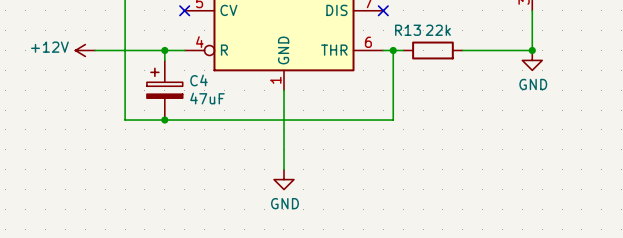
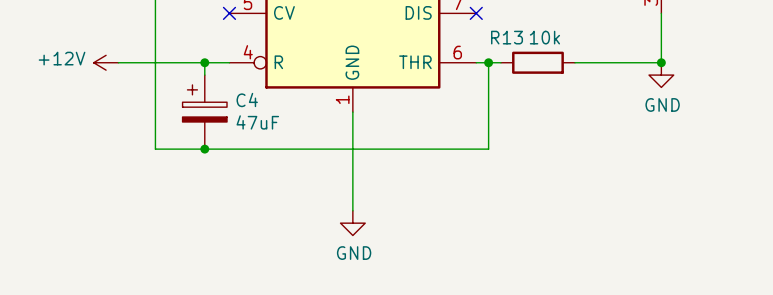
R13 value: 22k (438, 30) -> 10k (544, 37)

